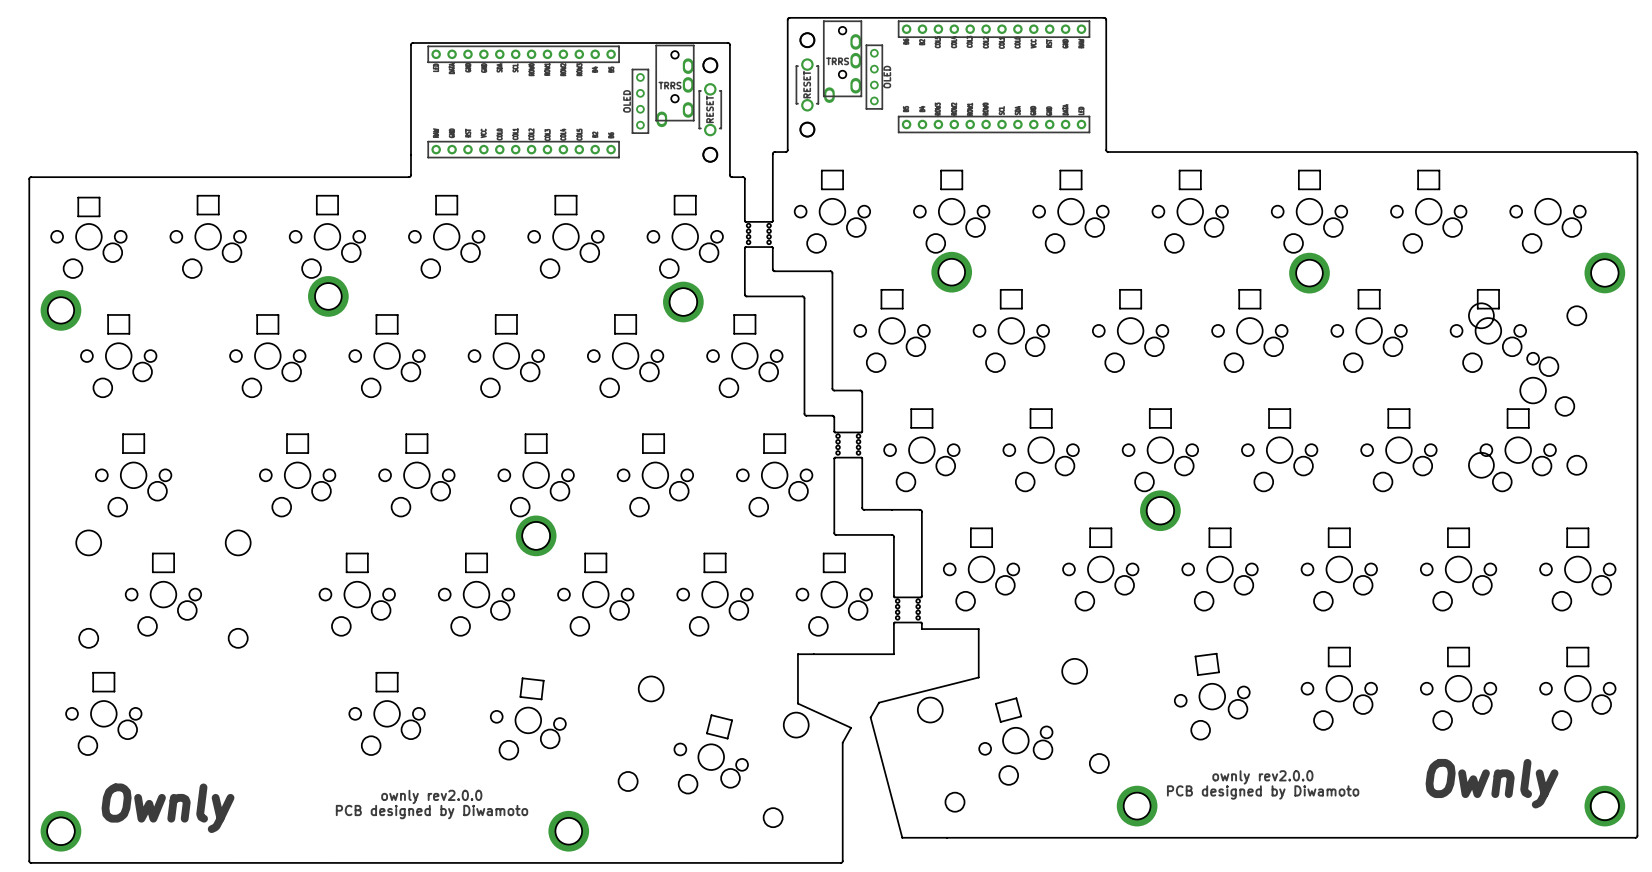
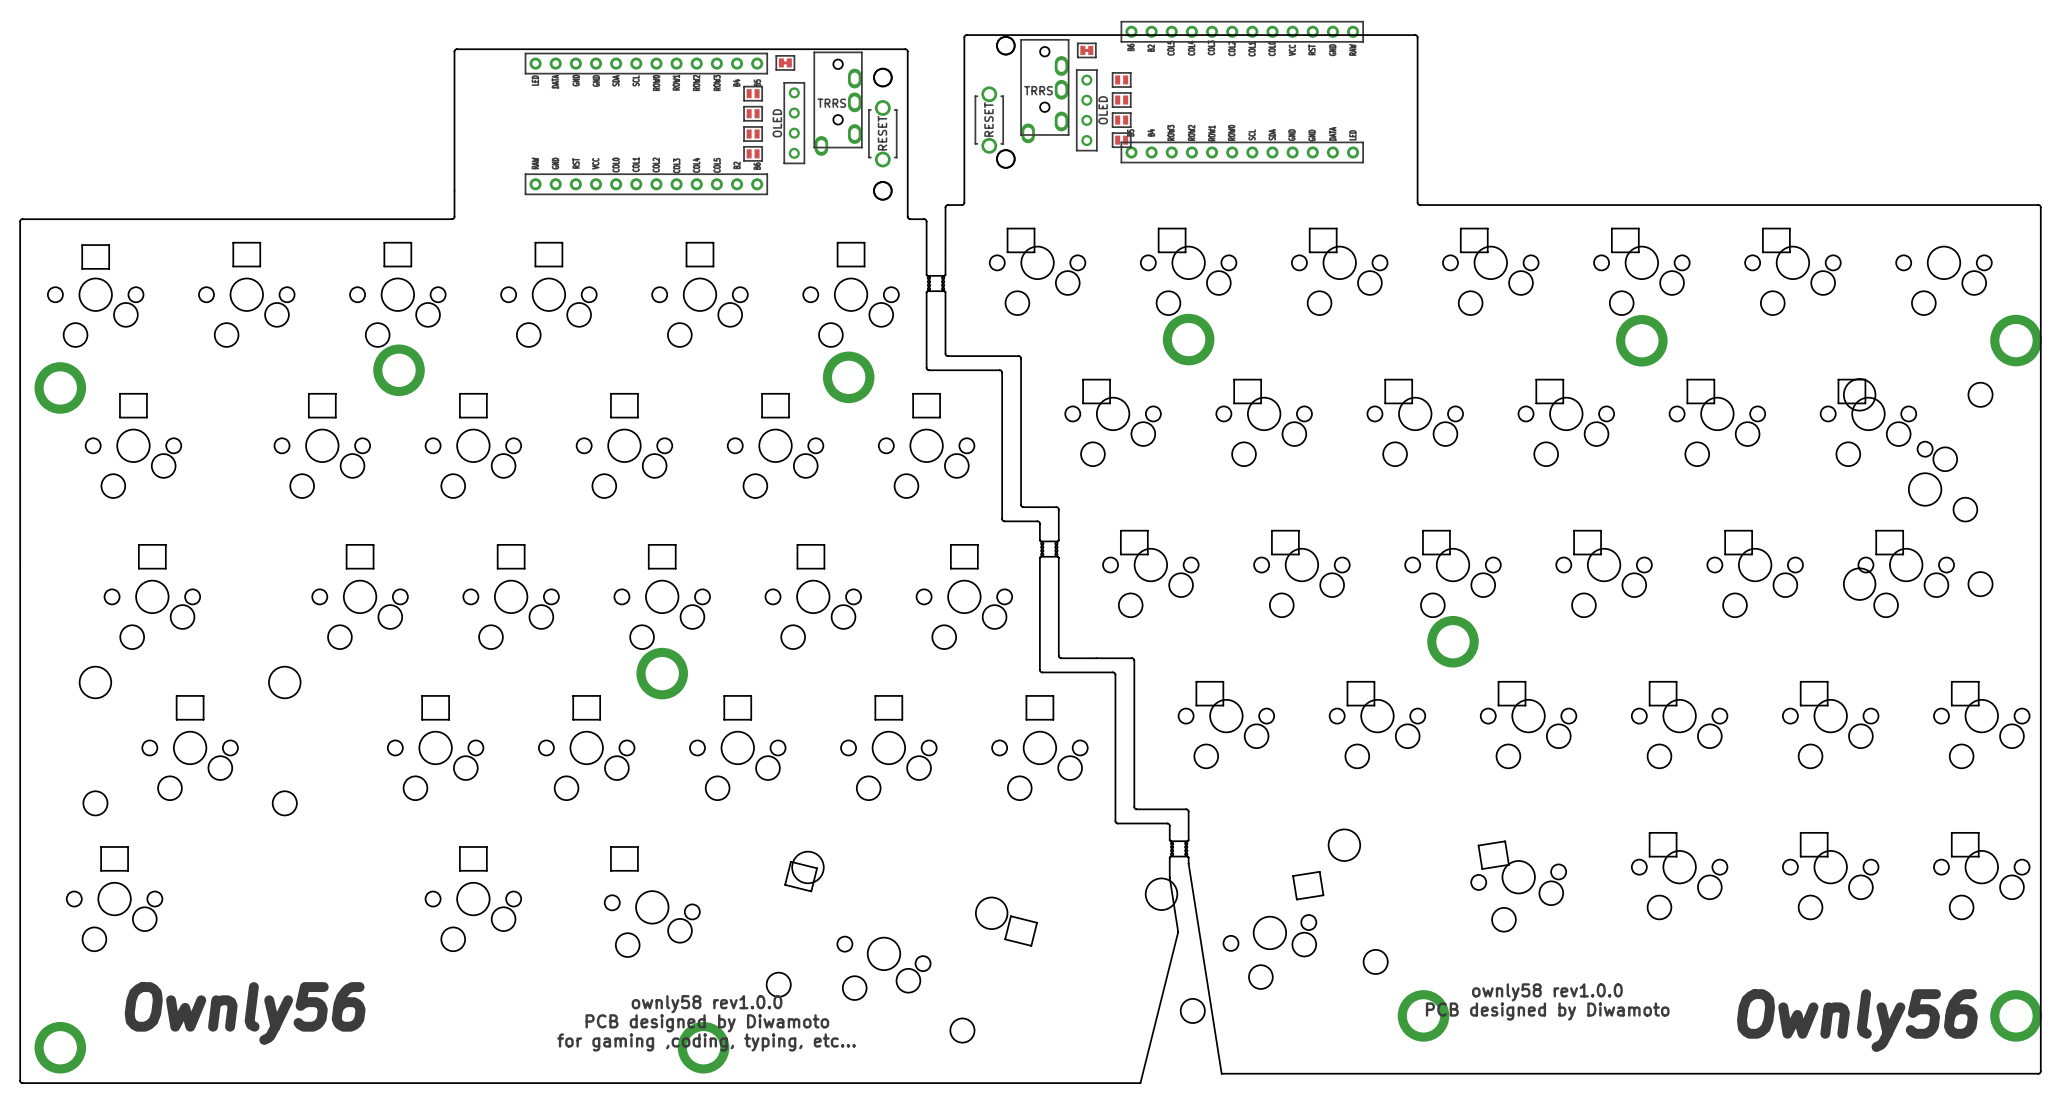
board edge: (412, 42) (410, 44) (410, 175) (370, 177) -> (506, 49) (456, 49) (454, 50) (454, 216) (452, 219)
part: none -> (1086, 50)
part: none -> (785, 62)
part position: (842, 61) -> (1044, 91)
part: none -> (1121, 79)
part position: (874, 77) -> (1086, 110)
part: none -> (753, 93)
part: none -> (1121, 100)
part position: (807, 84) -> (989, 120)
part: none -> (753, 113)
part: none -> (1121, 120)
part: none -> (753, 134)
part: none -> (1121, 140)
part: none -> (753, 153)
part position: (832, 179) -> (1021, 240)
part position: (951, 179) -> (1172, 240)
part position: (1070, 179) -> (1323, 240)
part position: (1190, 179) -> (1474, 240)
part position: (1309, 179) -> (1625, 240)
part position: (1428, 179) -> (1776, 240)
board edge: (758, 221) (772, 221) (772, 153) (787, 150) (787, 19) (789, 17) (1105, 17) (1106, 150) (1107, 151) (1637, 153) (1636, 837) (902, 837) (870, 717) (879, 702) (978, 677) (978, 629) (921, 629) (921, 622) (893, 623) -> (1115, 750) (1115, 784)
round board edge: none -> [927, 276, 931, 280]
round board edge: none -> [941, 276, 945, 280]
round board edge: [746, 223, 751, 228] -> none
round board edge: [767, 223, 772, 228] -> none
round board edge: none -> [927, 280, 931, 284]
round board edge: none -> [941, 280, 945, 284]
round board edge: none -> [927, 283, 931, 287]
round board edge: none -> [941, 283, 945, 287]
round board edge: [746, 229, 751, 234] -> none
round board edge: [767, 229, 772, 234] -> none
round board edge: none -> [927, 287, 931, 291]
round board edge: none -> [941, 287, 945, 291]
round board edge: [746, 234, 751, 239] -> none
round board edge: [767, 234, 772, 239] -> none
round board edge: [746, 240, 751, 245] -> none
round board edge: [767, 240, 772, 245] -> none
board edge: (744, 247) (772, 247) (774, 271) (832, 272) (832, 389) (860, 390) (862, 392) (862, 432) (835, 432) (834, 430) -> (926, 308) (926, 291) (945, 291) (946, 355) (1020, 357) (1021, 505) (1023, 507) (1056, 507) (1058, 509) (1058, 540) (1039, 540)
round board edge: [938, 258, 966, 286] -> none
round board edge: [1295, 259, 1323, 287] -> none
round board edge: [1590, 259, 1619, 287] -> none
round board edge: [314, 282, 342, 310] -> none
round board edge: [669, 288, 698, 317] -> none
round board edge: [47, 297, 75, 324] -> none
part position: (892, 299) -> (1096, 391)
part position: (1011, 299) -> (1247, 391)
part position: (1130, 299) -> (1398, 391)
part position: (1249, 299) -> (1549, 391)
part position: (1369, 299) -> (1700, 391)
part position: (1488, 299) -> (1851, 391)
part position: (921, 418) -> (1134, 542)
part position: (1041, 418) -> (1285, 542)
part position: (1160, 418) -> (1436, 542)
part position: (1279, 418) -> (1587, 542)
part position: (1398, 418) -> (1738, 542)
part position: (1518, 418) -> (1889, 542)
round board edge: none -> [1040, 542, 1044, 546]
round board edge: none -> [1055, 542, 1058, 546]
round board edge: [836, 434, 841, 439] -> none
round board edge: [856, 434, 861, 439] -> none
round board edge: none -> [1040, 545, 1044, 549]
round board edge: none -> [1055, 545, 1058, 549]
round board edge: none -> [1040, 549, 1044, 553]
round board edge: none -> [1055, 549, 1058, 553]
round board edge: [836, 439, 841, 444] -> none
round board edge: [856, 439, 861, 444] -> none
round board edge: none -> [1040, 553, 1044, 556]
round board edge: none -> [1055, 553, 1058, 556]
round board edge: [836, 445, 841, 450] -> none
round board edge: [856, 445, 861, 450] -> none
round board edge: [836, 450, 841, 455] -> none
round board edge: [856, 450, 861, 455] -> none
board edge: (834, 458) (862, 458) (863, 509) (921, 510) (921, 596) (893, 596) -> (1039, 575) (1040, 557) (1058, 557) (1059, 657) (1134, 659) (1134, 807) (1136, 809) (1187, 809) (1188, 840) (1170, 840) (1167, 823) (1117, 823) (1115, 821)
round board edge: [1146, 496, 1175, 525] -> none
round board edge: [522, 521, 551, 551] -> none
part position: (981, 537) -> (1209, 693)
part position: (1100, 537) -> (1360, 693)
part position: (1220, 537) -> (1512, 693)
part position: (1339, 537) -> (1663, 693)
part position: (1458, 537) -> (1814, 693)
part position: (1577, 537) -> (1965, 693)
round board edge: [895, 599, 900, 604] -> none
round board edge: [916, 599, 921, 604] -> none
round board edge: [895, 604, 900, 609] -> none
round board edge: [916, 604, 921, 609] -> none
round board edge: [895, 610, 900, 615] -> none
round board edge: [916, 610, 921, 615] -> none
round board edge: [895, 615, 900, 620] -> none
round board edge: [916, 615, 921, 620] -> none
board edge: (893, 652) (893, 654) (797, 654) (797, 703) (851, 727) (842, 742) (841, 862) (31, 862) (29, 857) -> (944, 275) (945, 206) (962, 204) (964, 202) (964, 37) (966, 35) (1416, 35) (1417, 202) (1419, 205) (2039, 205) (2040, 1072) (1221, 1073) (1188, 857) (1170, 856) (1169, 877) (1178, 932) (1140, 1083) (22, 1083) (20, 1080)
part position: (1339, 657) -> (1663, 844)
part position: (1458, 657) -> (1814, 844)
part position: (1577, 657) -> (1965, 844)
part: (1207, 664) -> none
round board edge: none -> [1170, 842, 1174, 845]
round board edge: none -> [1184, 842, 1188, 845]
round board edge: none -> [1170, 845, 1174, 849]
round board edge: none -> [1184, 845, 1188, 849]
round board edge: none -> [1170, 849, 1174, 853]
round board edge: none -> [1184, 849, 1188, 853]
round board edge: none -> [1170, 852, 1174, 856]
round board edge: none -> [1184, 852, 1188, 856]
part: none -> (1493, 855)
part: none -> (624, 858)
part: (532, 688) -> none
part: none -> (801, 876)
part: none -> (1308, 885)
part: (1008, 710) -> none
part: (719, 726) -> none
part: none -> (1021, 931)
drawing: [1425, 758, 1559, 809] -> none
text: ownly rev2.0.0 (1262, 777) -> ownly58 rev1.0.0 (1547, 992)
drawing: none -> [124, 982, 366, 1045]
drawing: [101, 783, 235, 834] -> none
drawing: none -> [1737, 989, 1978, 1052]
round board edge: [1590, 791, 1620, 821] -> none
round board edge: [1123, 792, 1151, 820] -> none
text position: PCB designed by Diwamoto (1263, 792) -> PCB designed by Diwamoto (1547, 1011)
text: ownly rev2.0.0 (431, 796) -> none
text: none -> ownly58 rev1.0.0 (707, 1004)
text position: PCB designed by Diwamoto (432, 812) -> PCB designed by Diwamoto (707, 1023)
round board edge: [46, 817, 75, 846] -> none
round board edge: [555, 817, 583, 845] -> none
text: none -> for gaming ,coding, typing, etc... (706, 1042)

